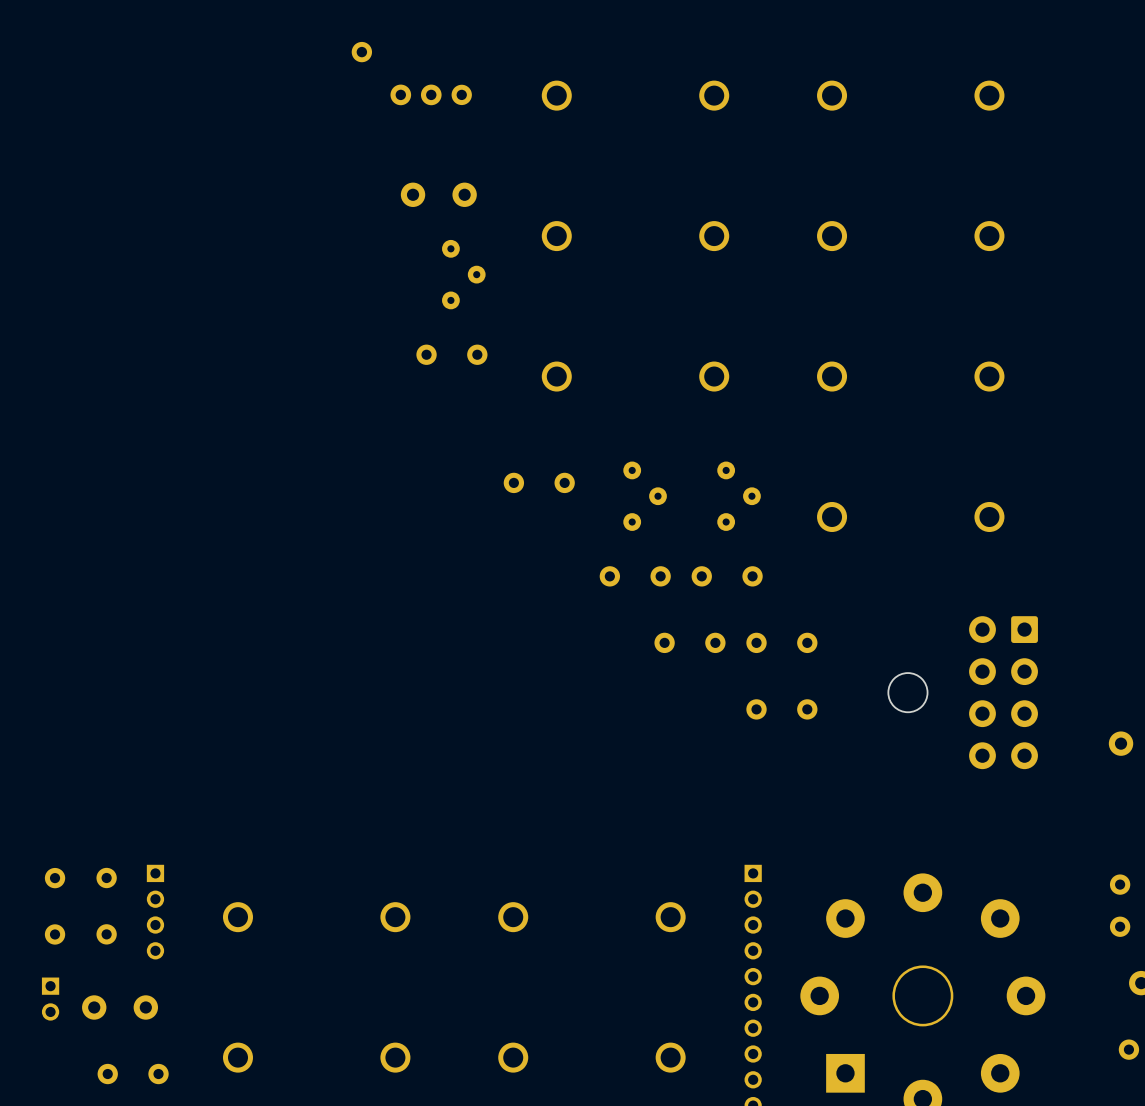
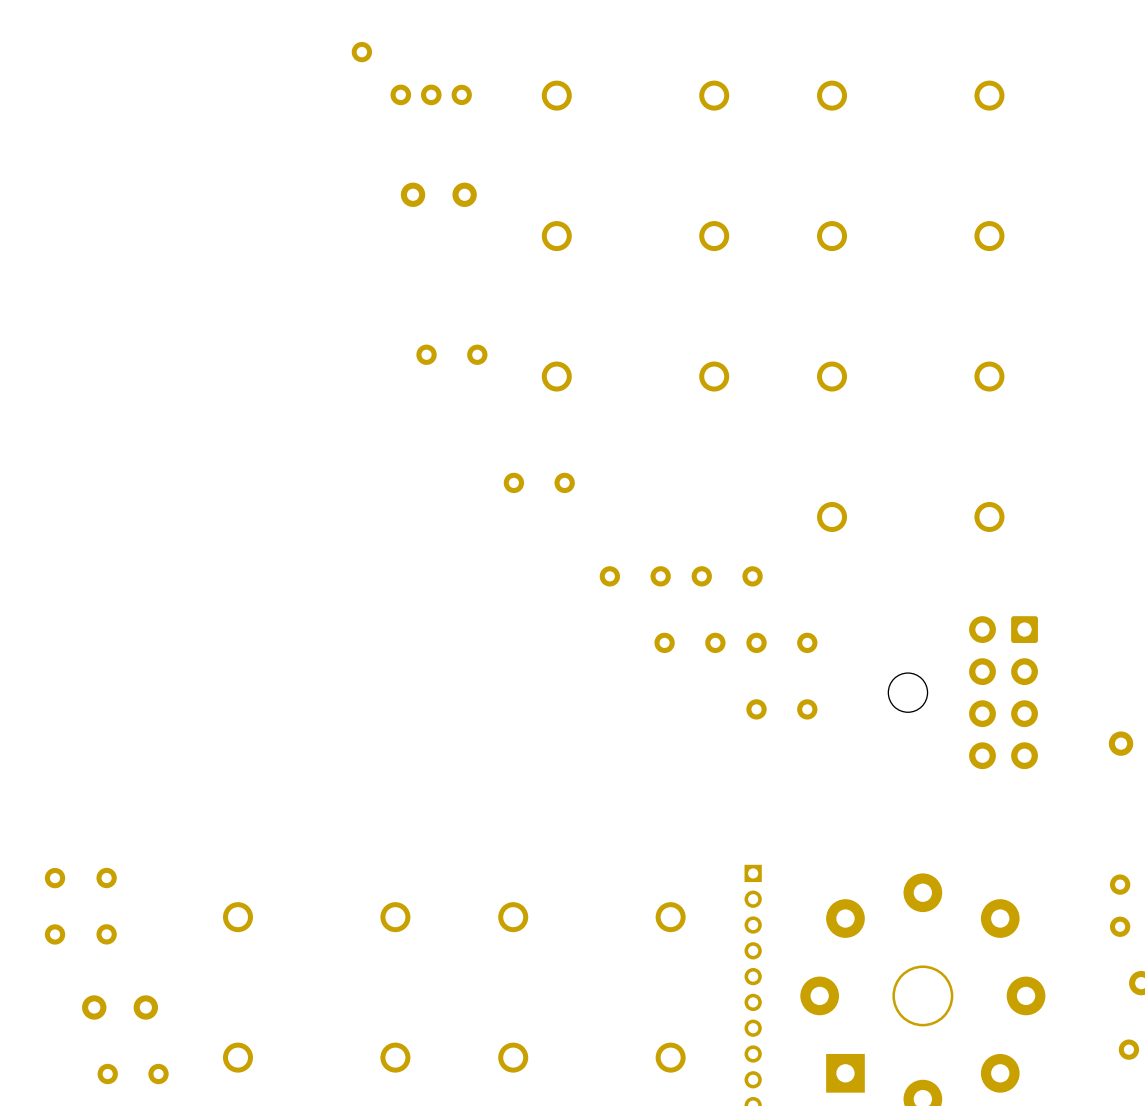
part: (463, 274) -> none
part: (645, 496) -> none
part: (739, 496) -> none
part: (155, 912) -> none
part: (50, 999) -> none

